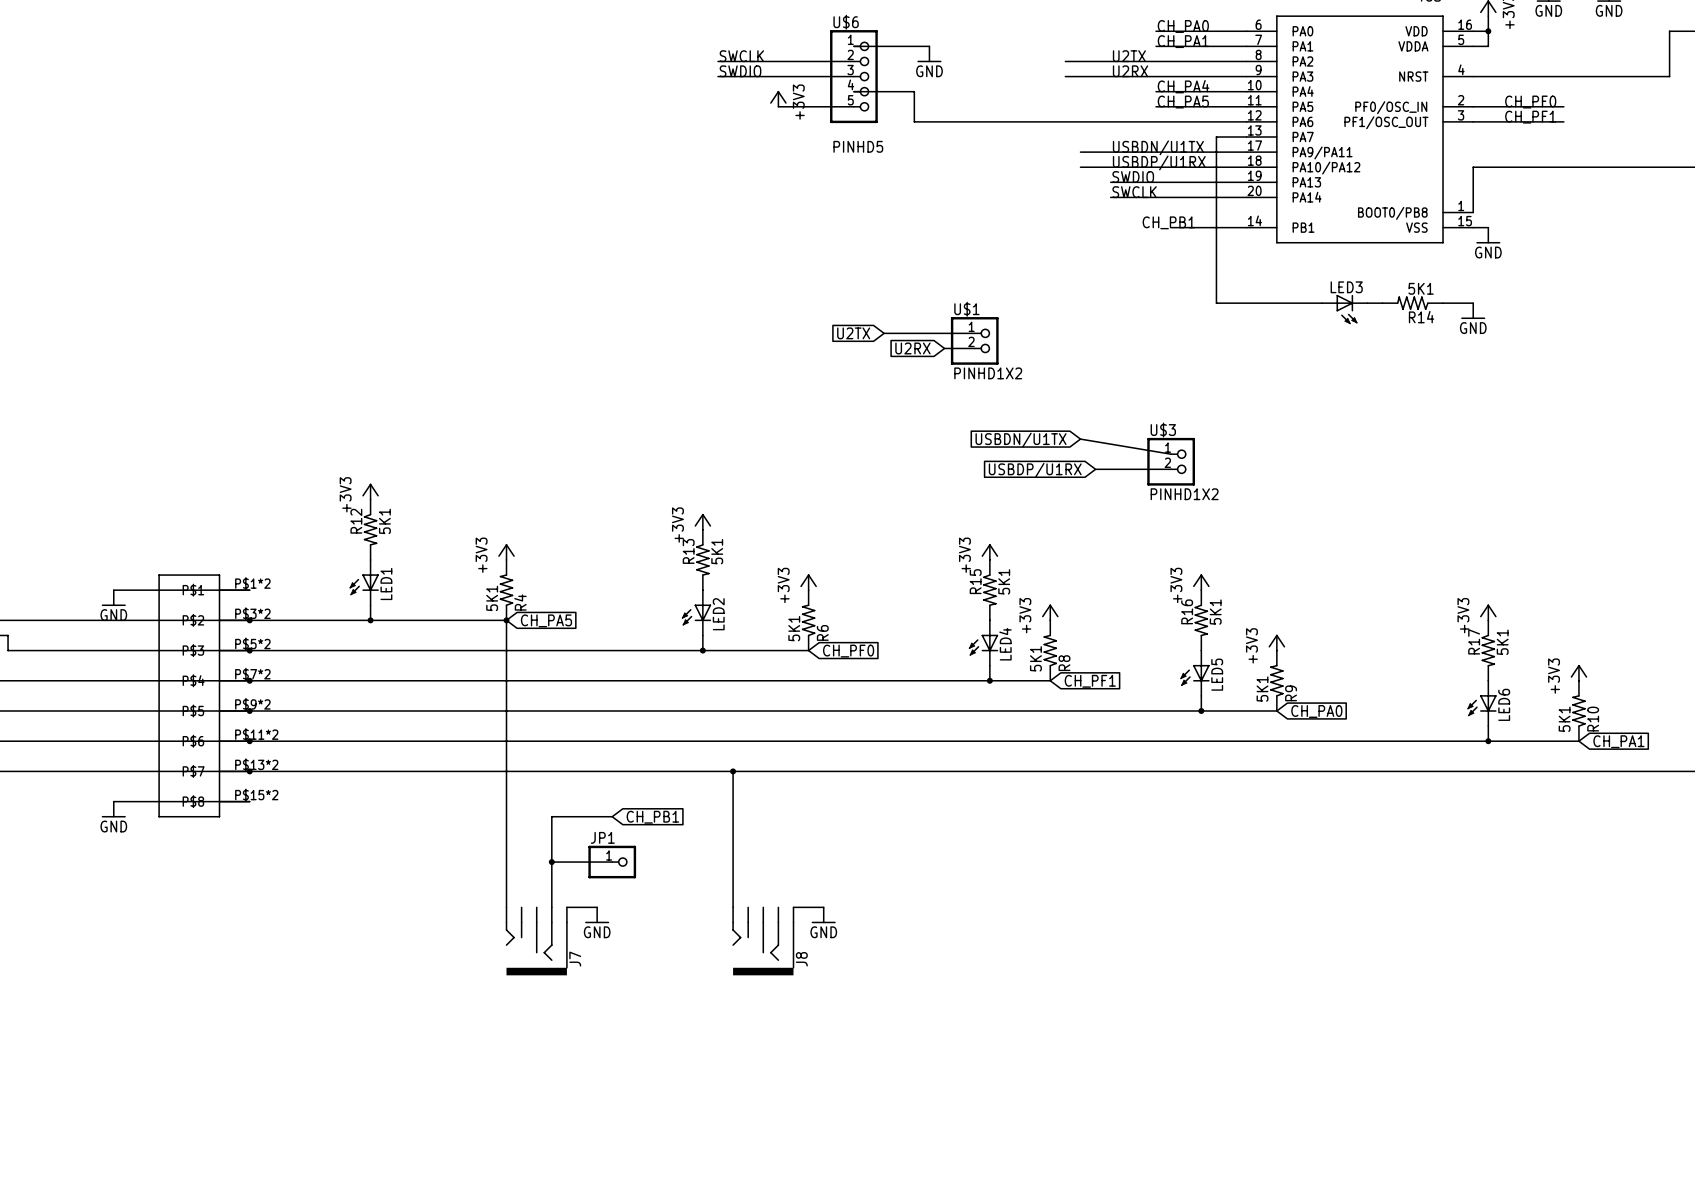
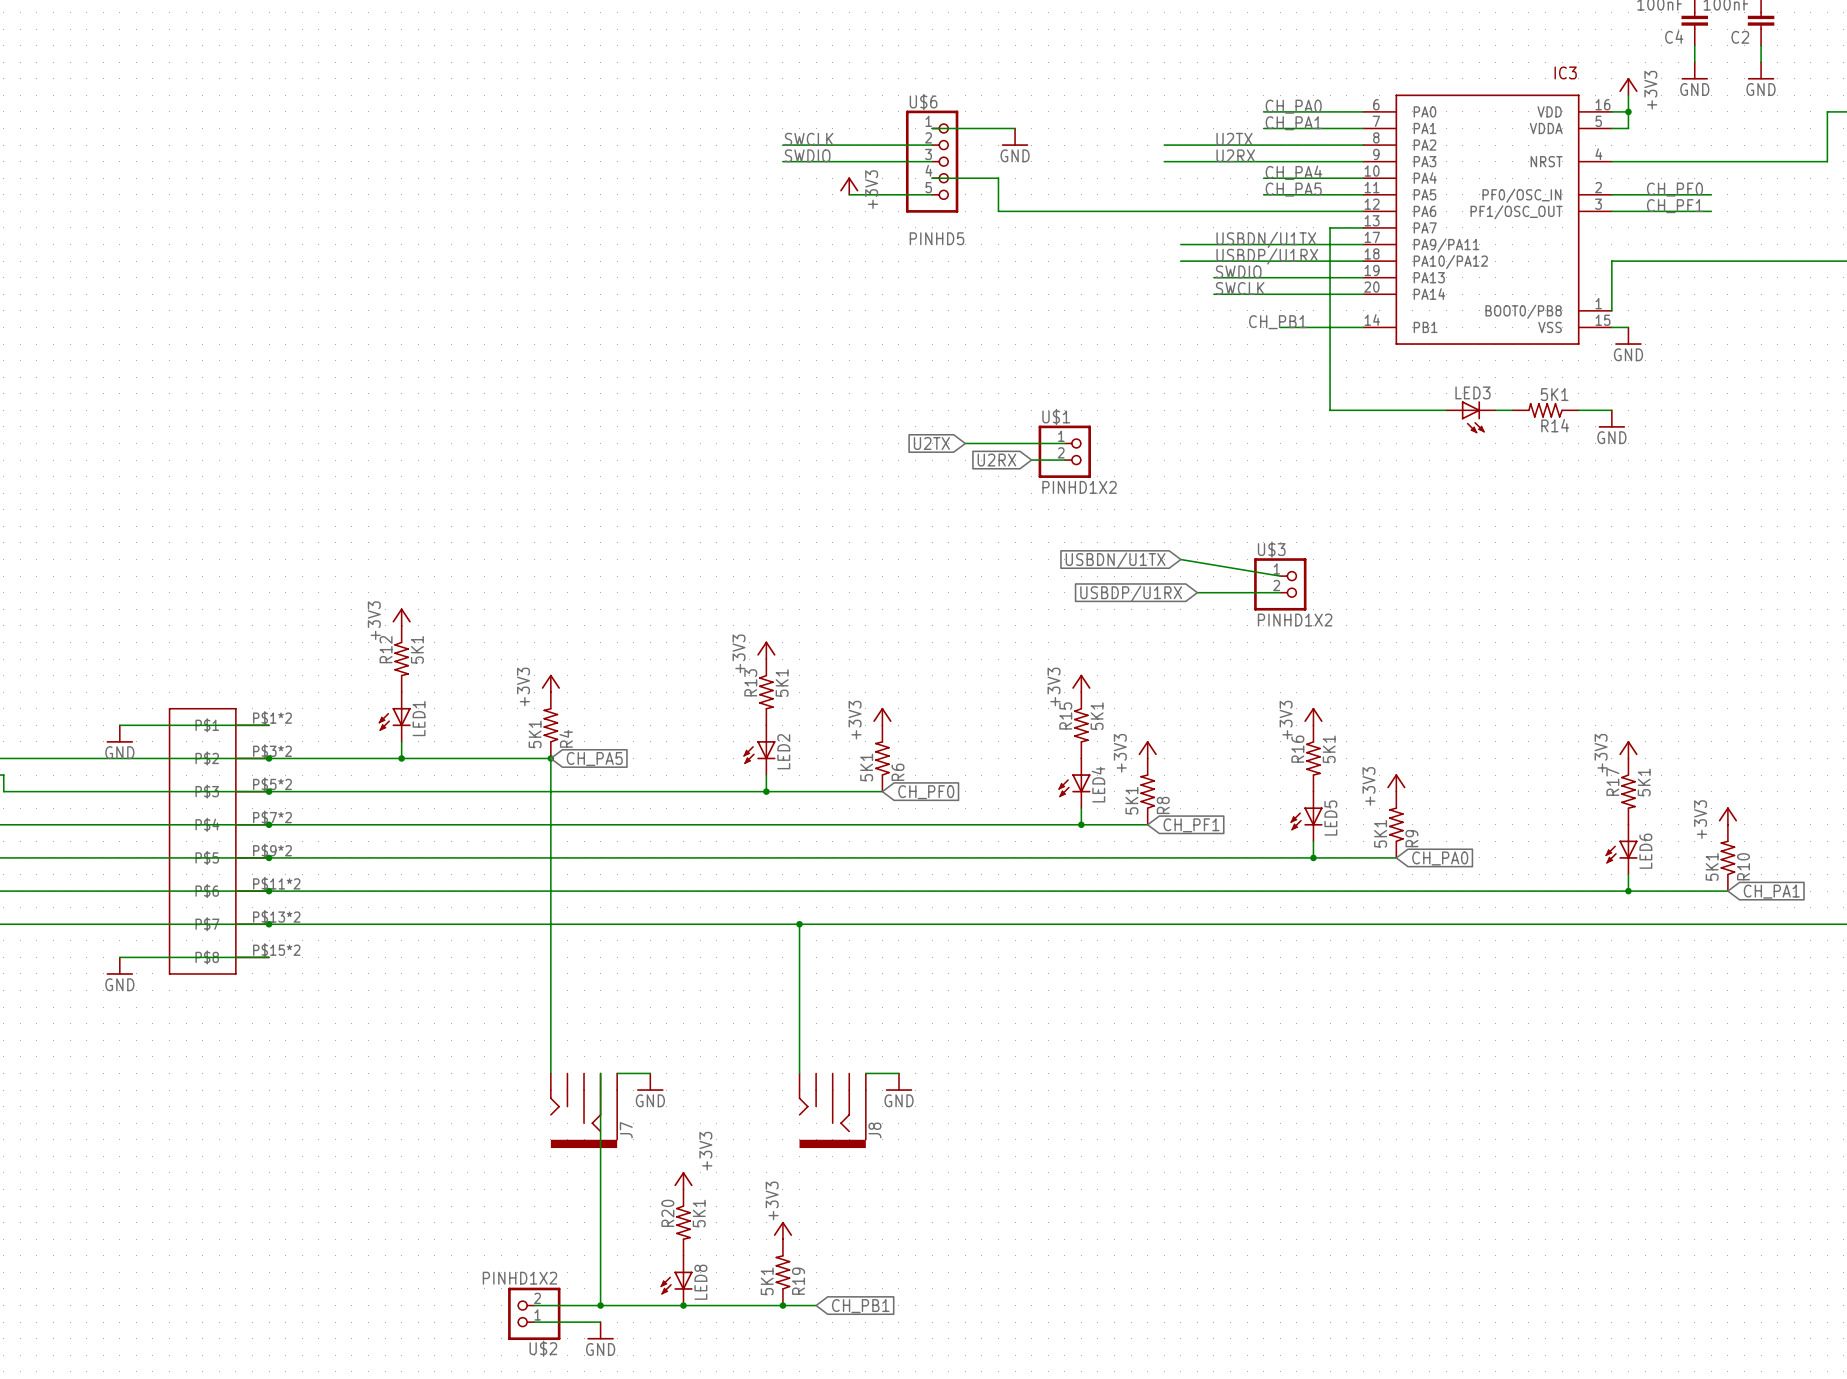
wire: (612, 816) (551, 816) (551, 907) -> (600, 1305) (600, 1073)
global label: CH_PB1 (652, 817) -> none
wire: (551, 862) (612, 862) -> none
junction: (551, 862) -> none
JP1: (612, 862) -> none
power symbol: none -> +3V3 (683, 1180)
R20: none -> 5K1 (683, 1222)
power symbol: none -> +3V3 (782, 1230)
R19: none -> 5K1 (782, 1272)
LED8: none -> (676, 1280)
wire: none -> (534, 1305) (816, 1305)
junction: none -> (600, 1305)
junction: none -> (683, 1305)
junction: none -> (782, 1305)
global label: none -> CH_PB1 (860, 1306)
U$2: none -> PINHD1X2 (534, 1313)
wire: none -> (534, 1322) (600, 1322)
power symbol: none -> GND (600, 1330)

